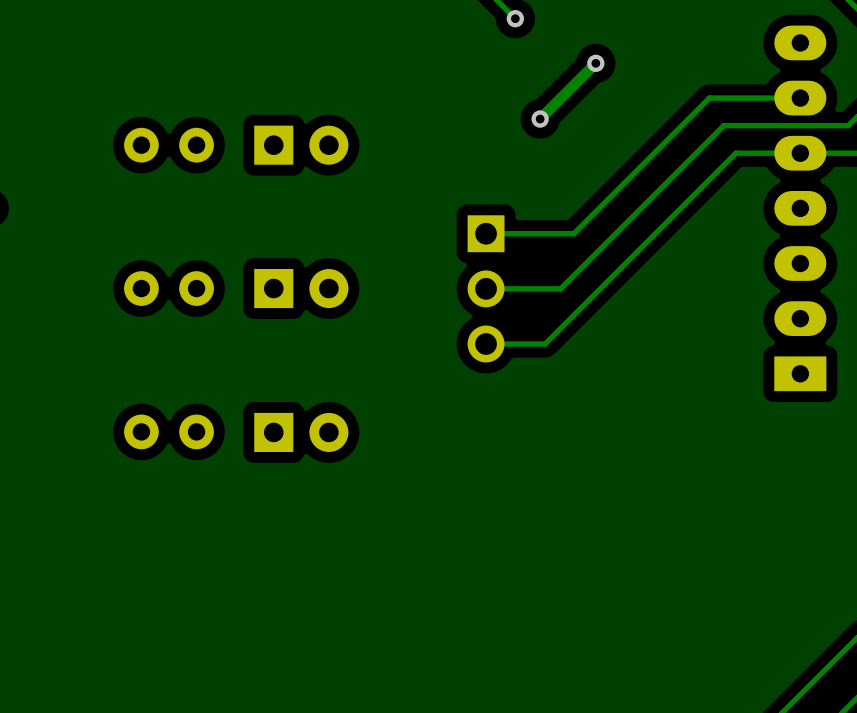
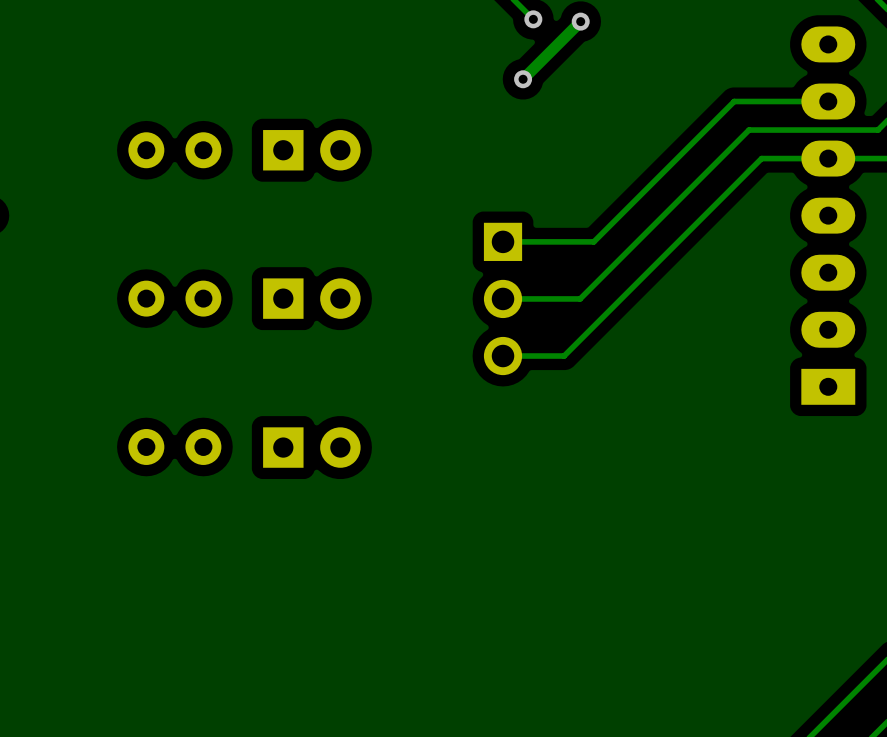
via: none -> (580, 21)
track: (595, 63) (540, 119) -> (580, 21) (523, 79)
via: (595, 63) -> none
via: none -> (523, 79)
via: (540, 119) -> none

